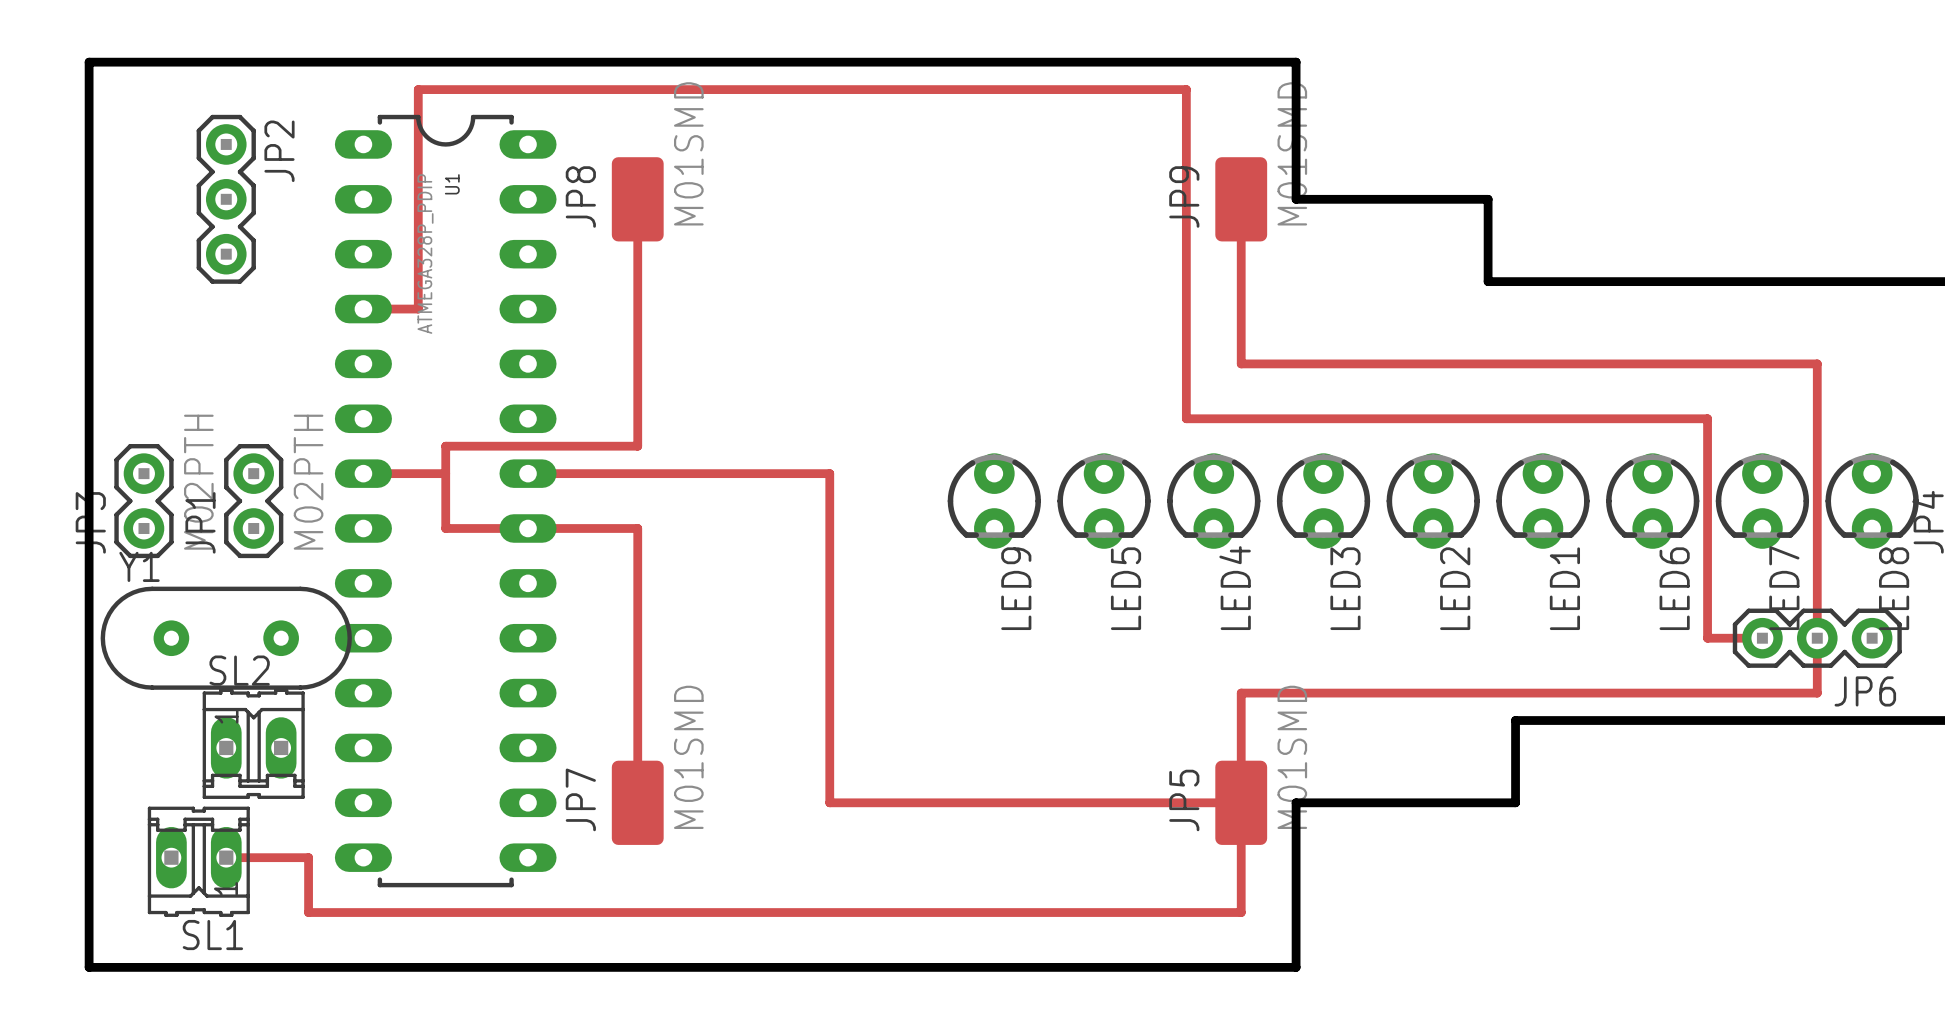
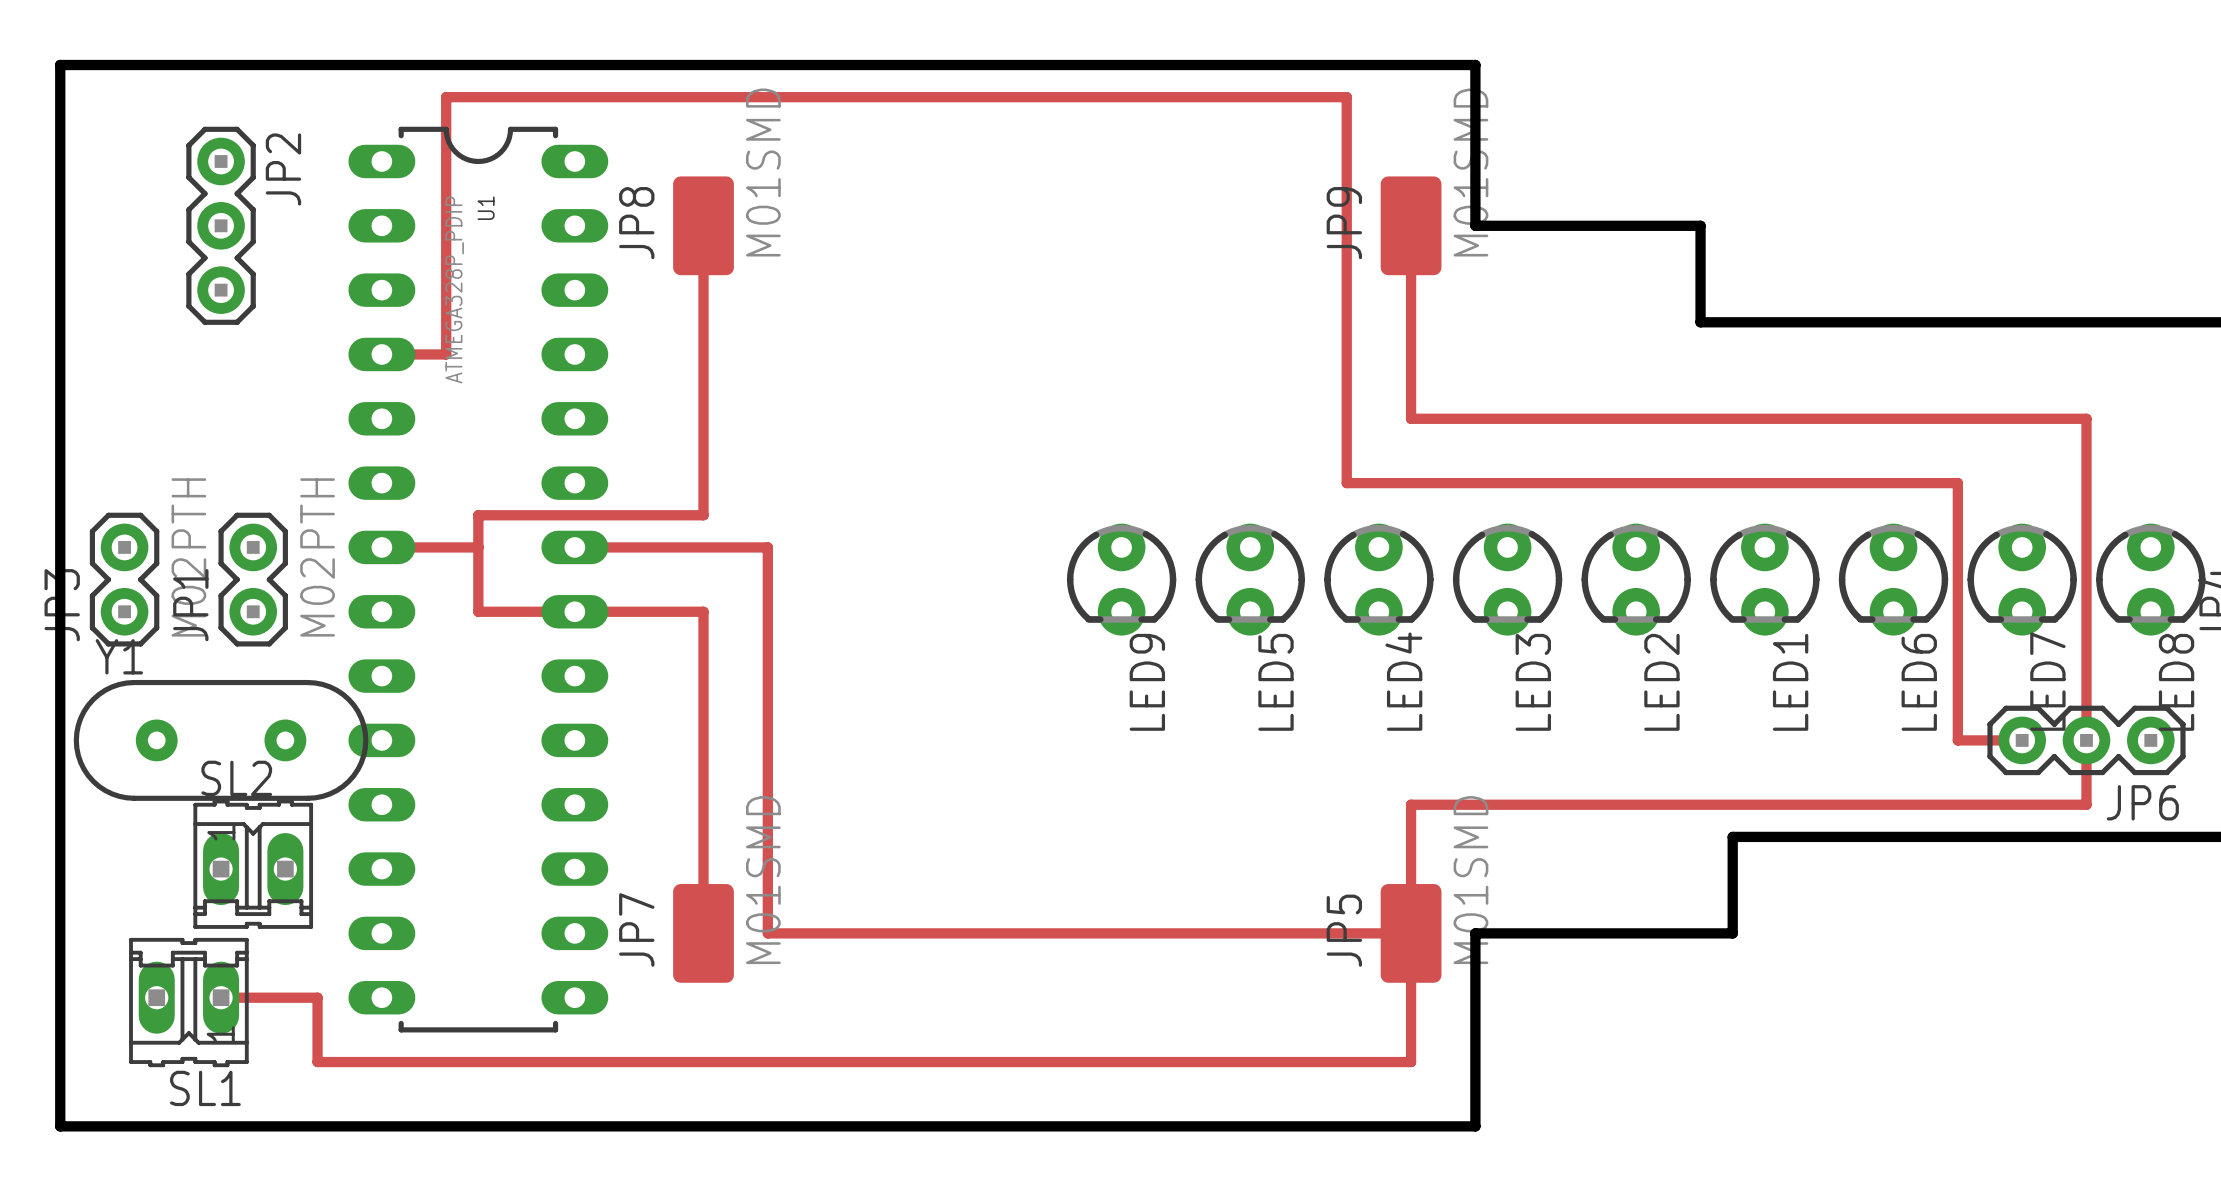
track: (692, 473) (829, 473) (829, 802) -> (767, 547) (767, 933) (928, 933)

